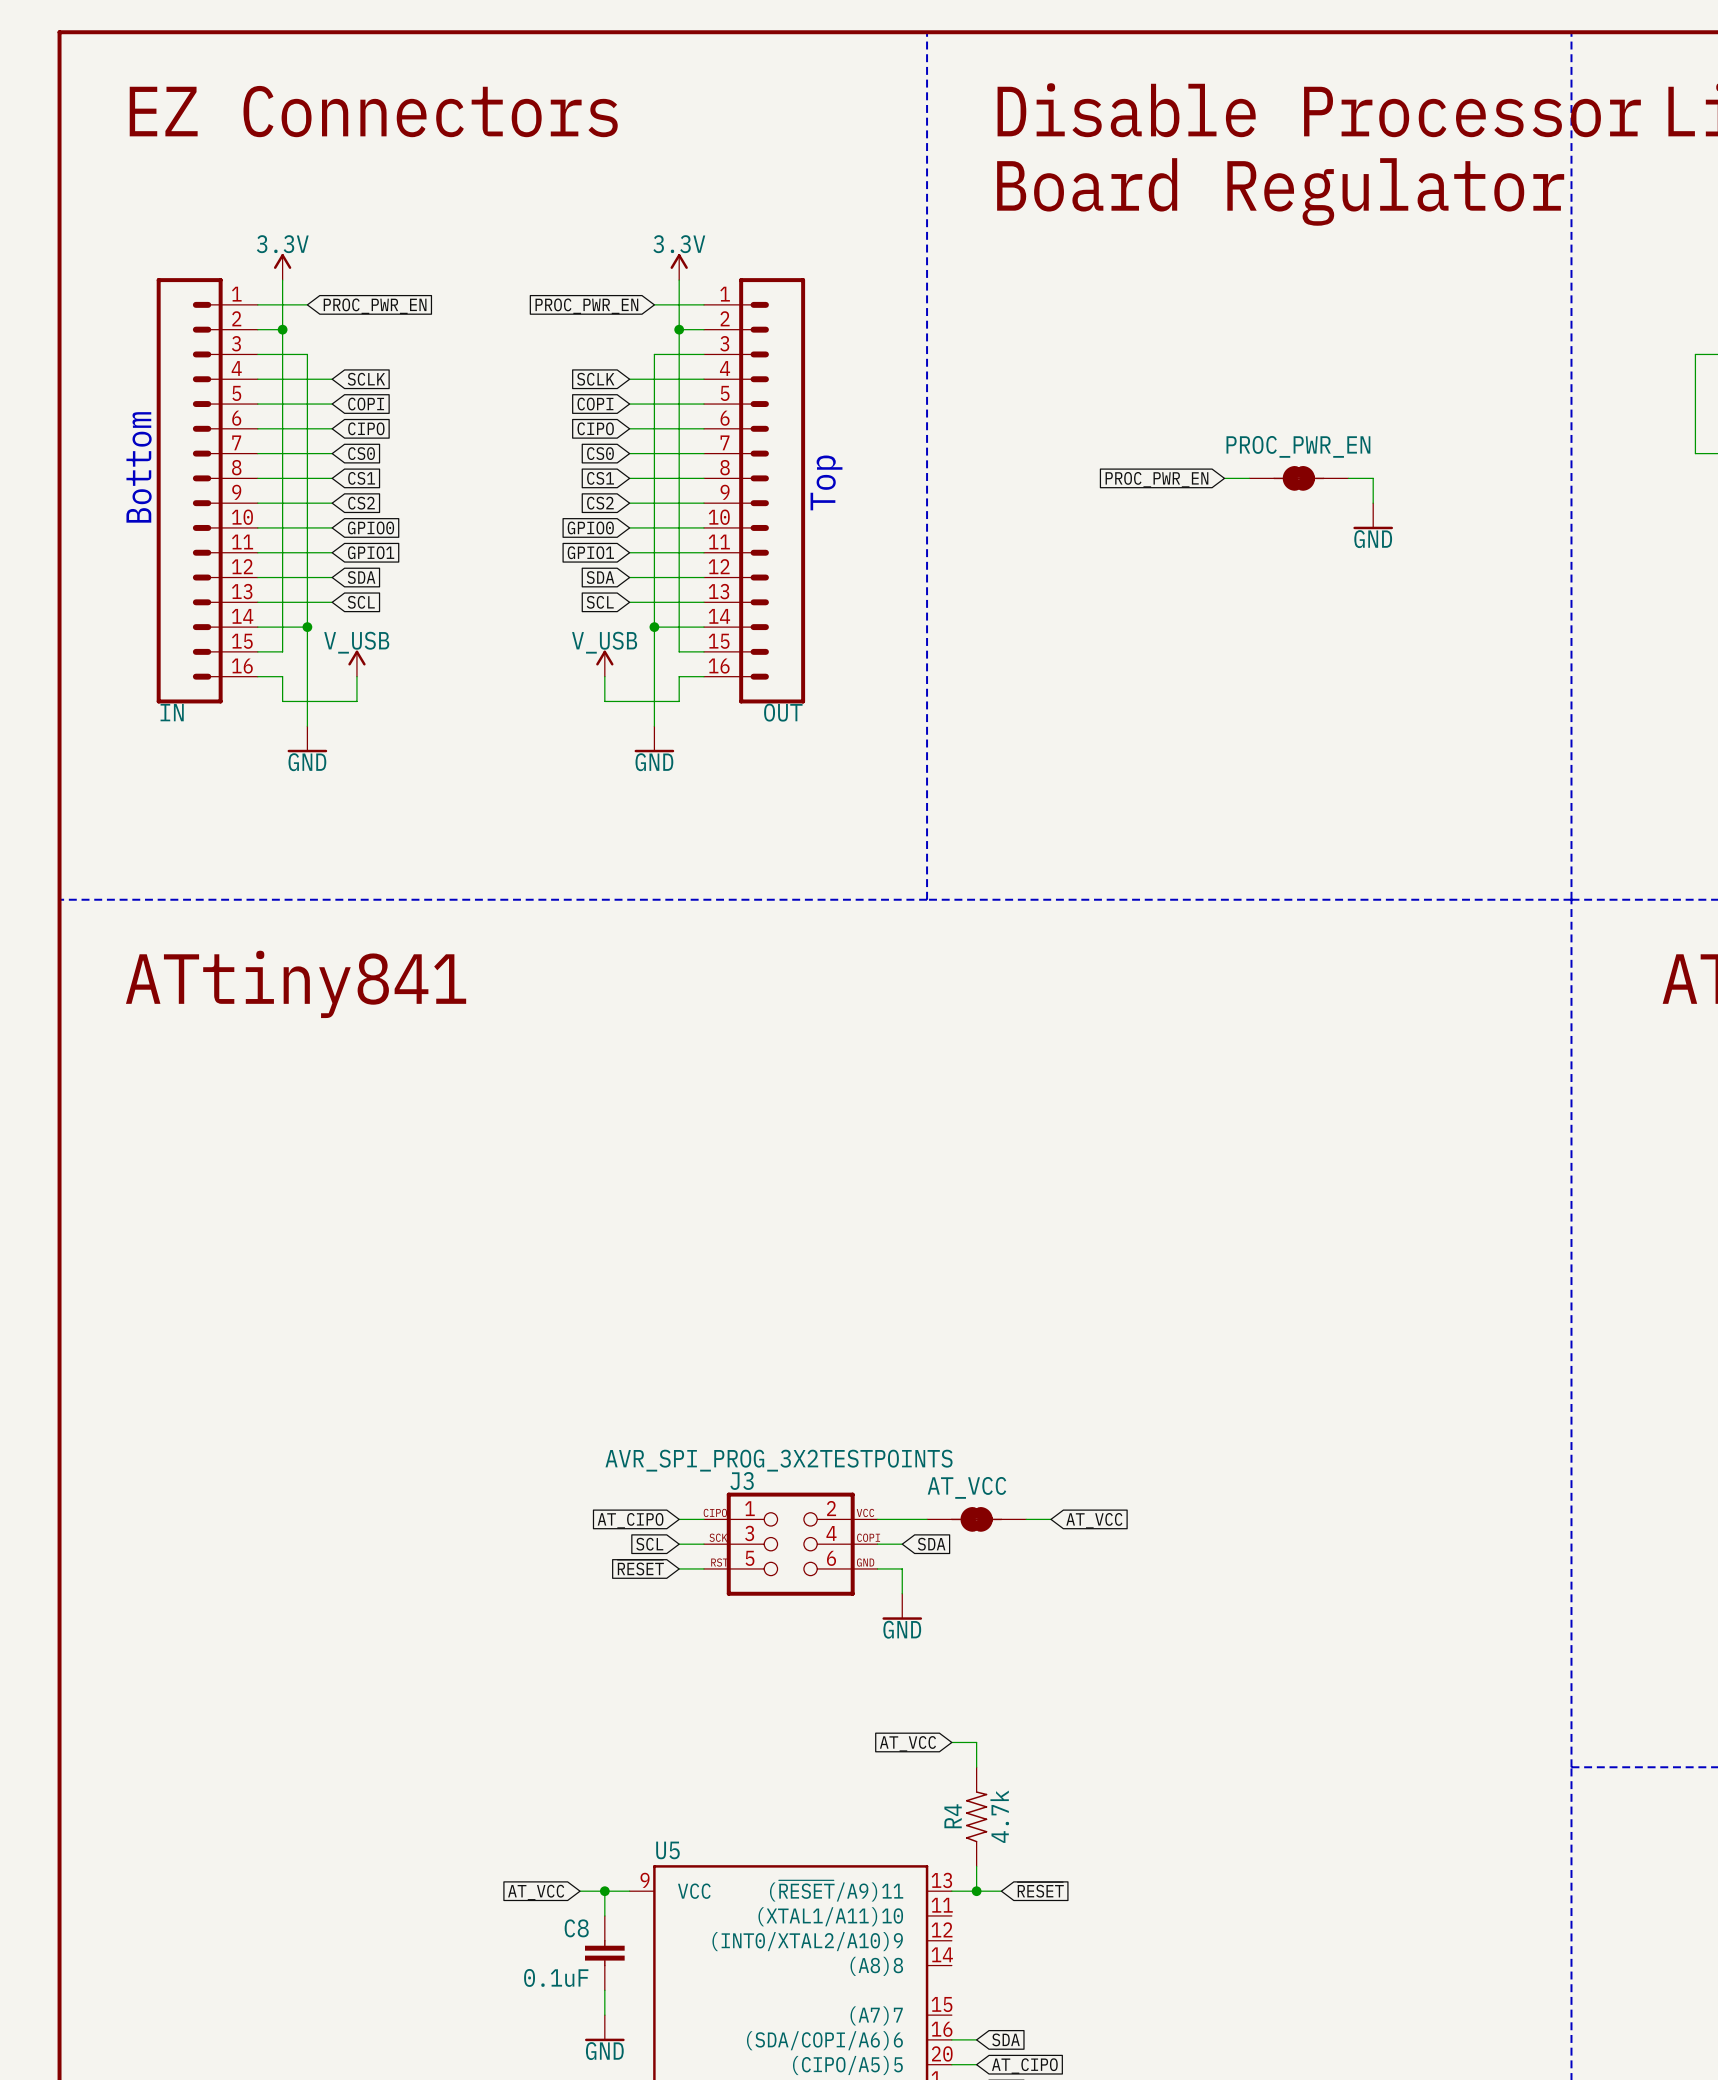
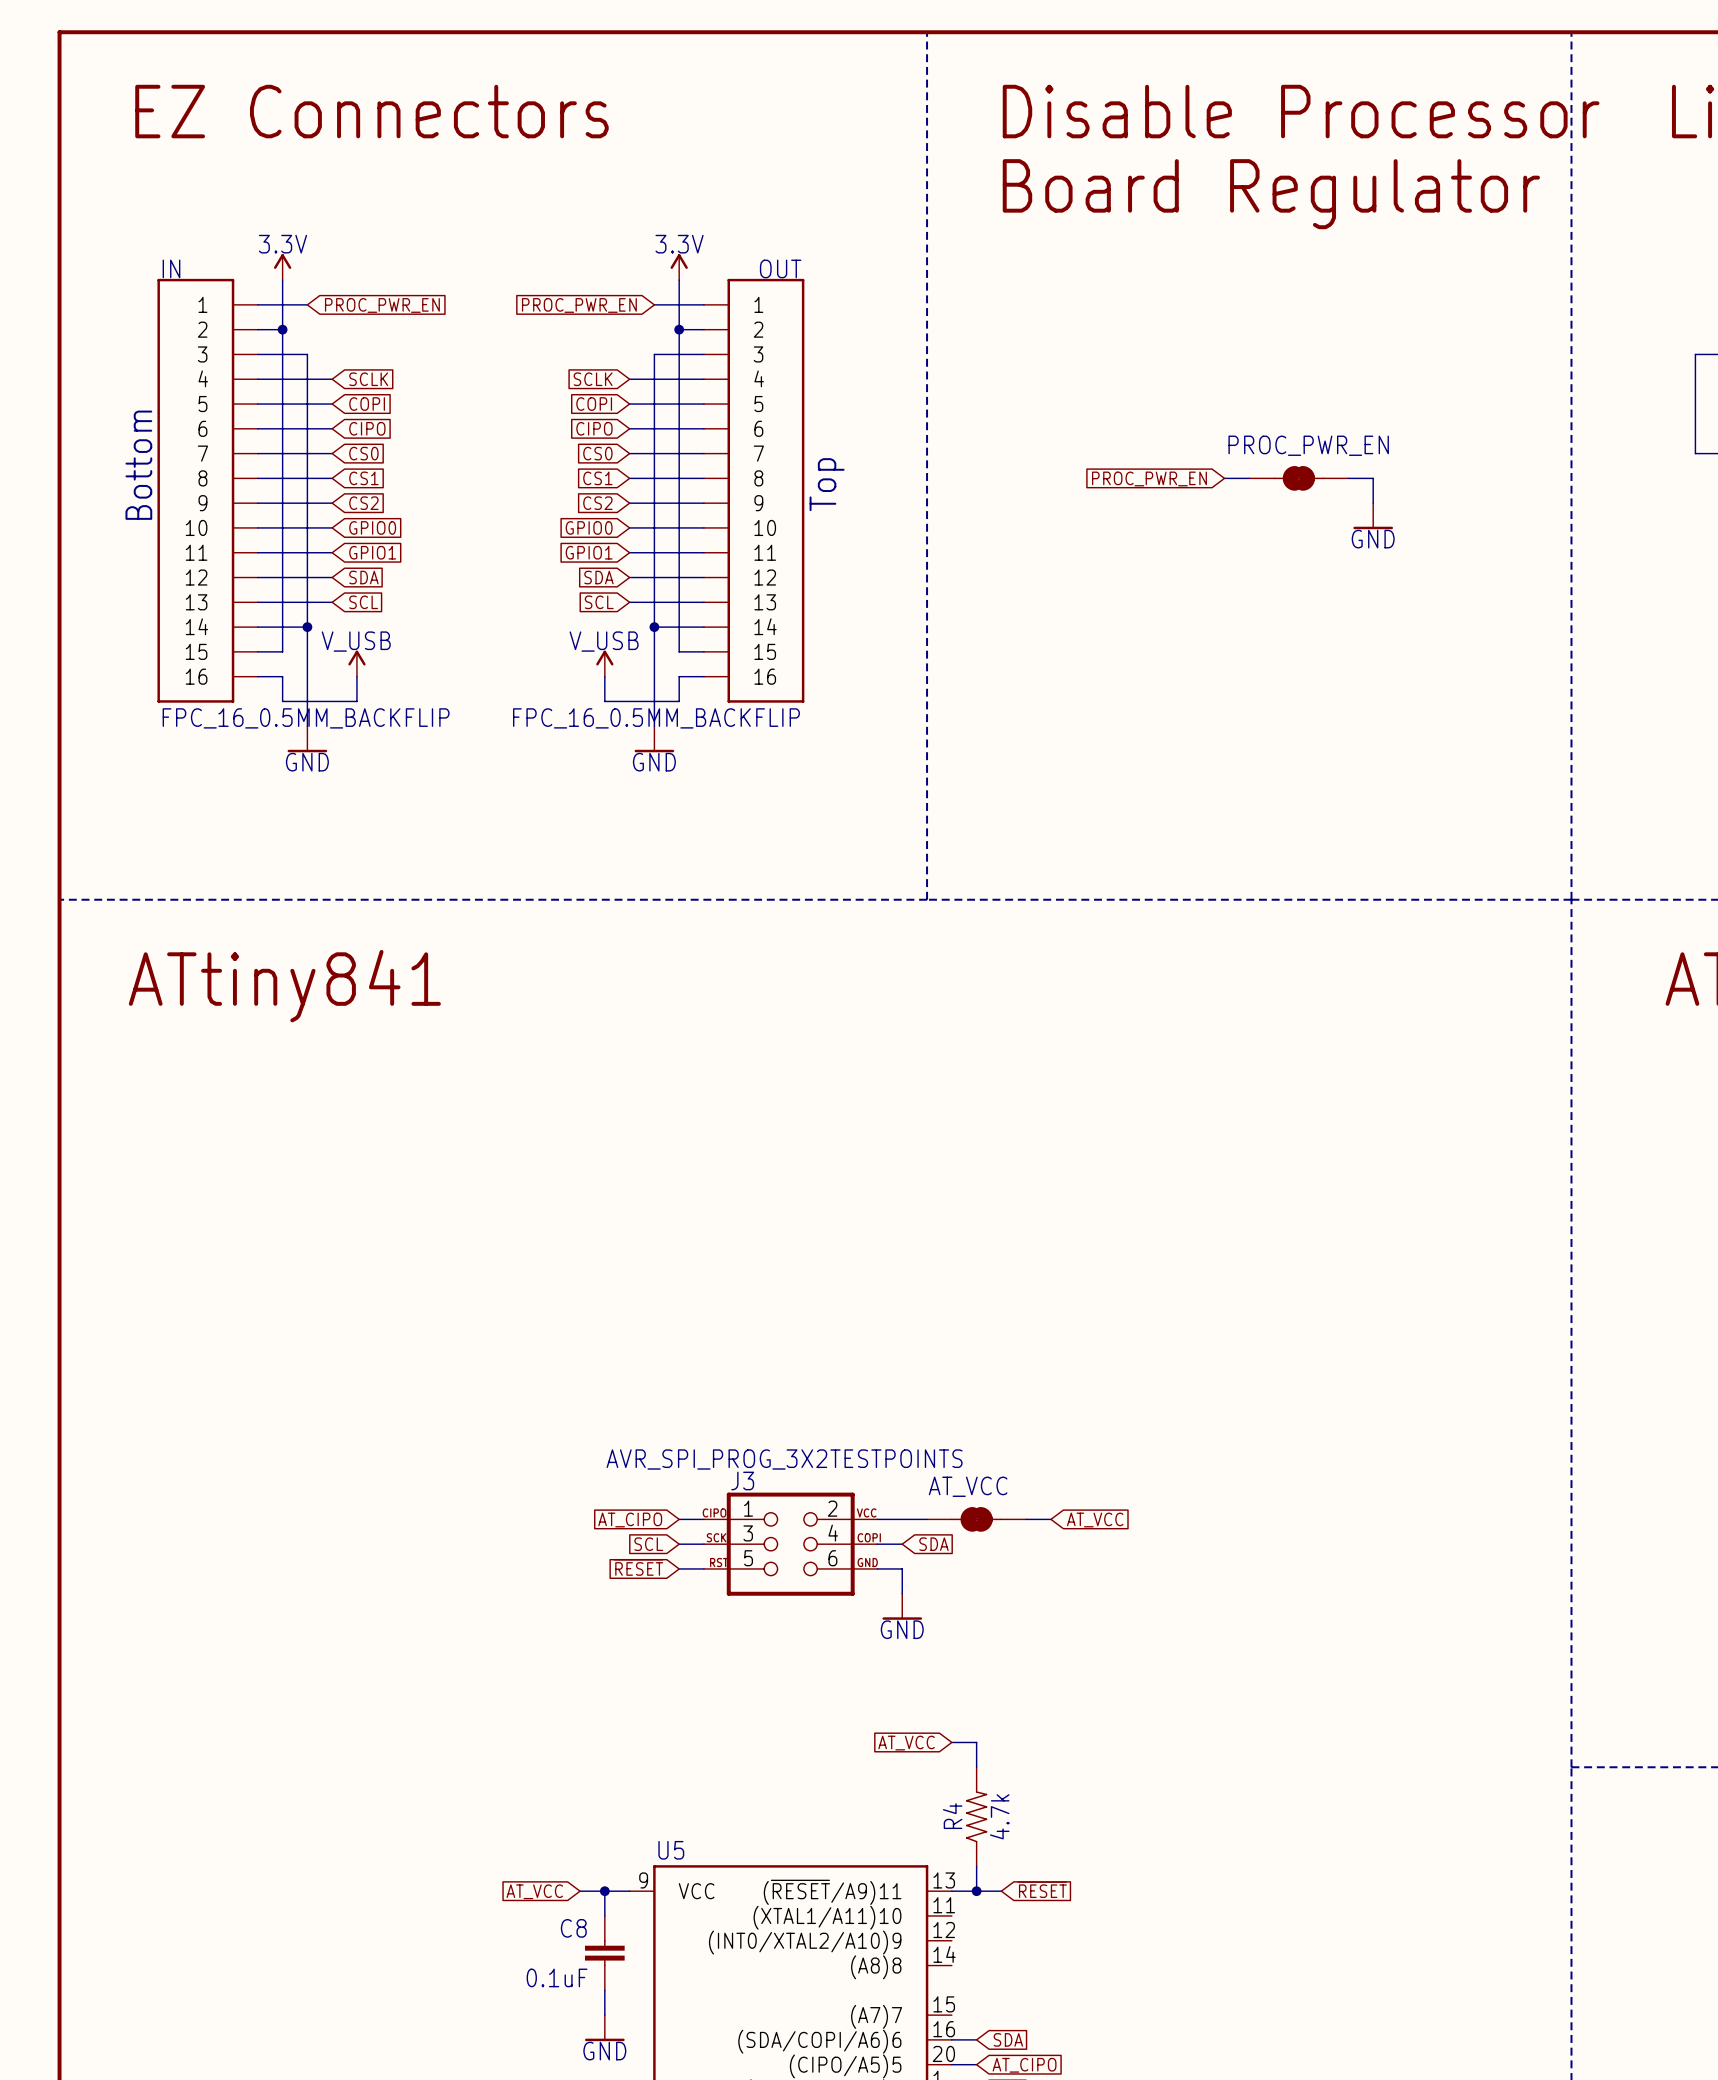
IN symbol: [156, 278, 258, 704] -> [157, 278, 258, 703]
OUT symbol: [703, 278, 806, 704] -> [703, 278, 805, 703]
IN name position: IN (172, 712) -> IN (171, 268)
OUT name position: OUT (783, 712) -> OUT (780, 268)
IN value: none -> FPC_16_0.5MM_BACKFLIP (306, 718)
OUT value: none -> FPC_16_0.5MM_BACKFLIP (656, 718)

